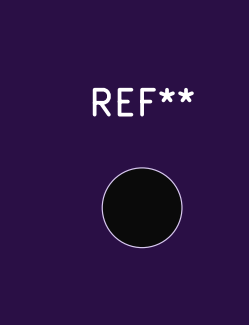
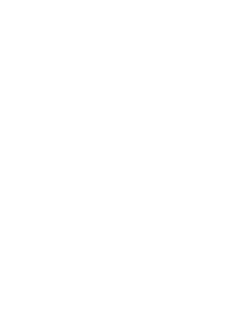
REF**: (142, 207) -> none

